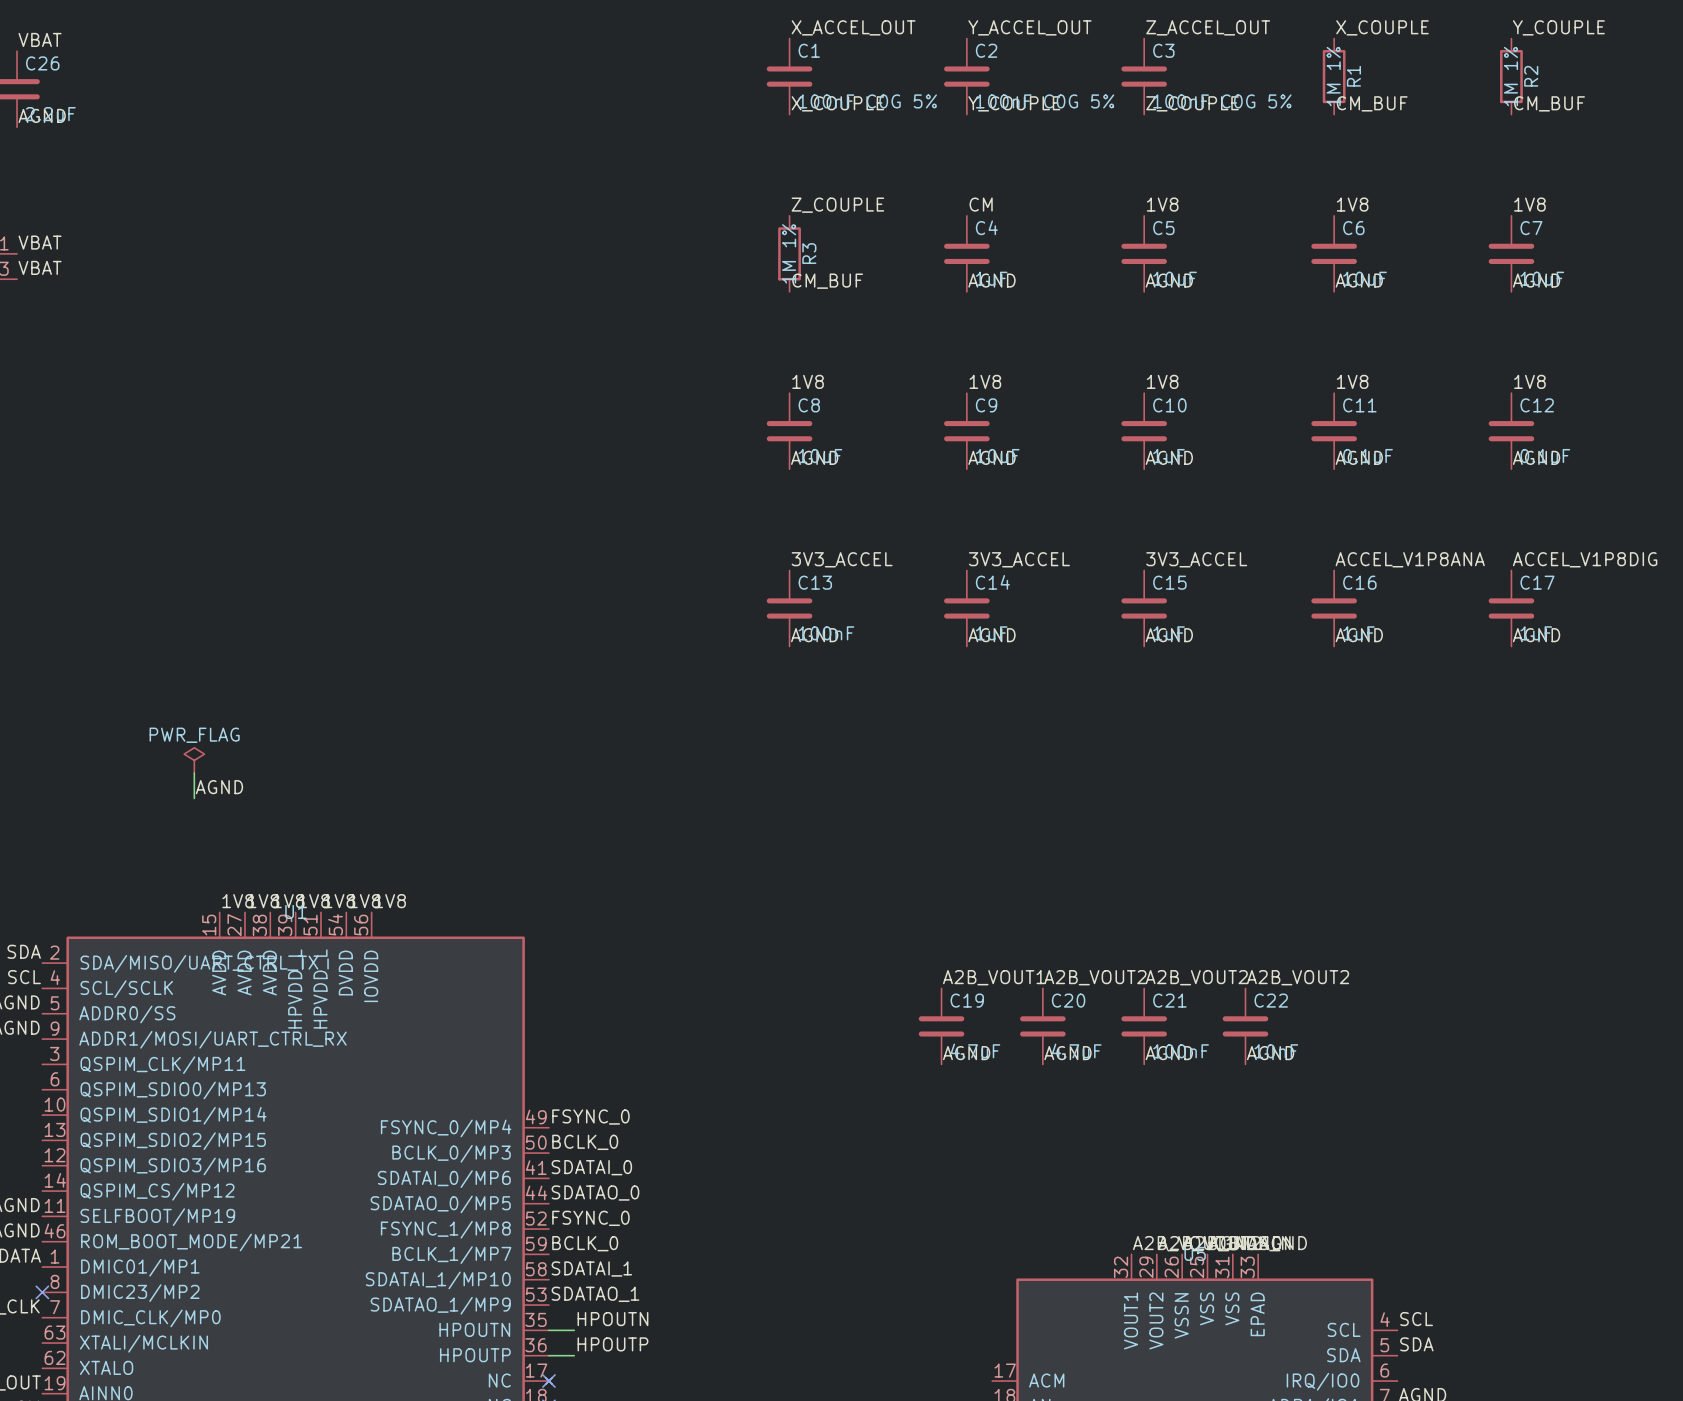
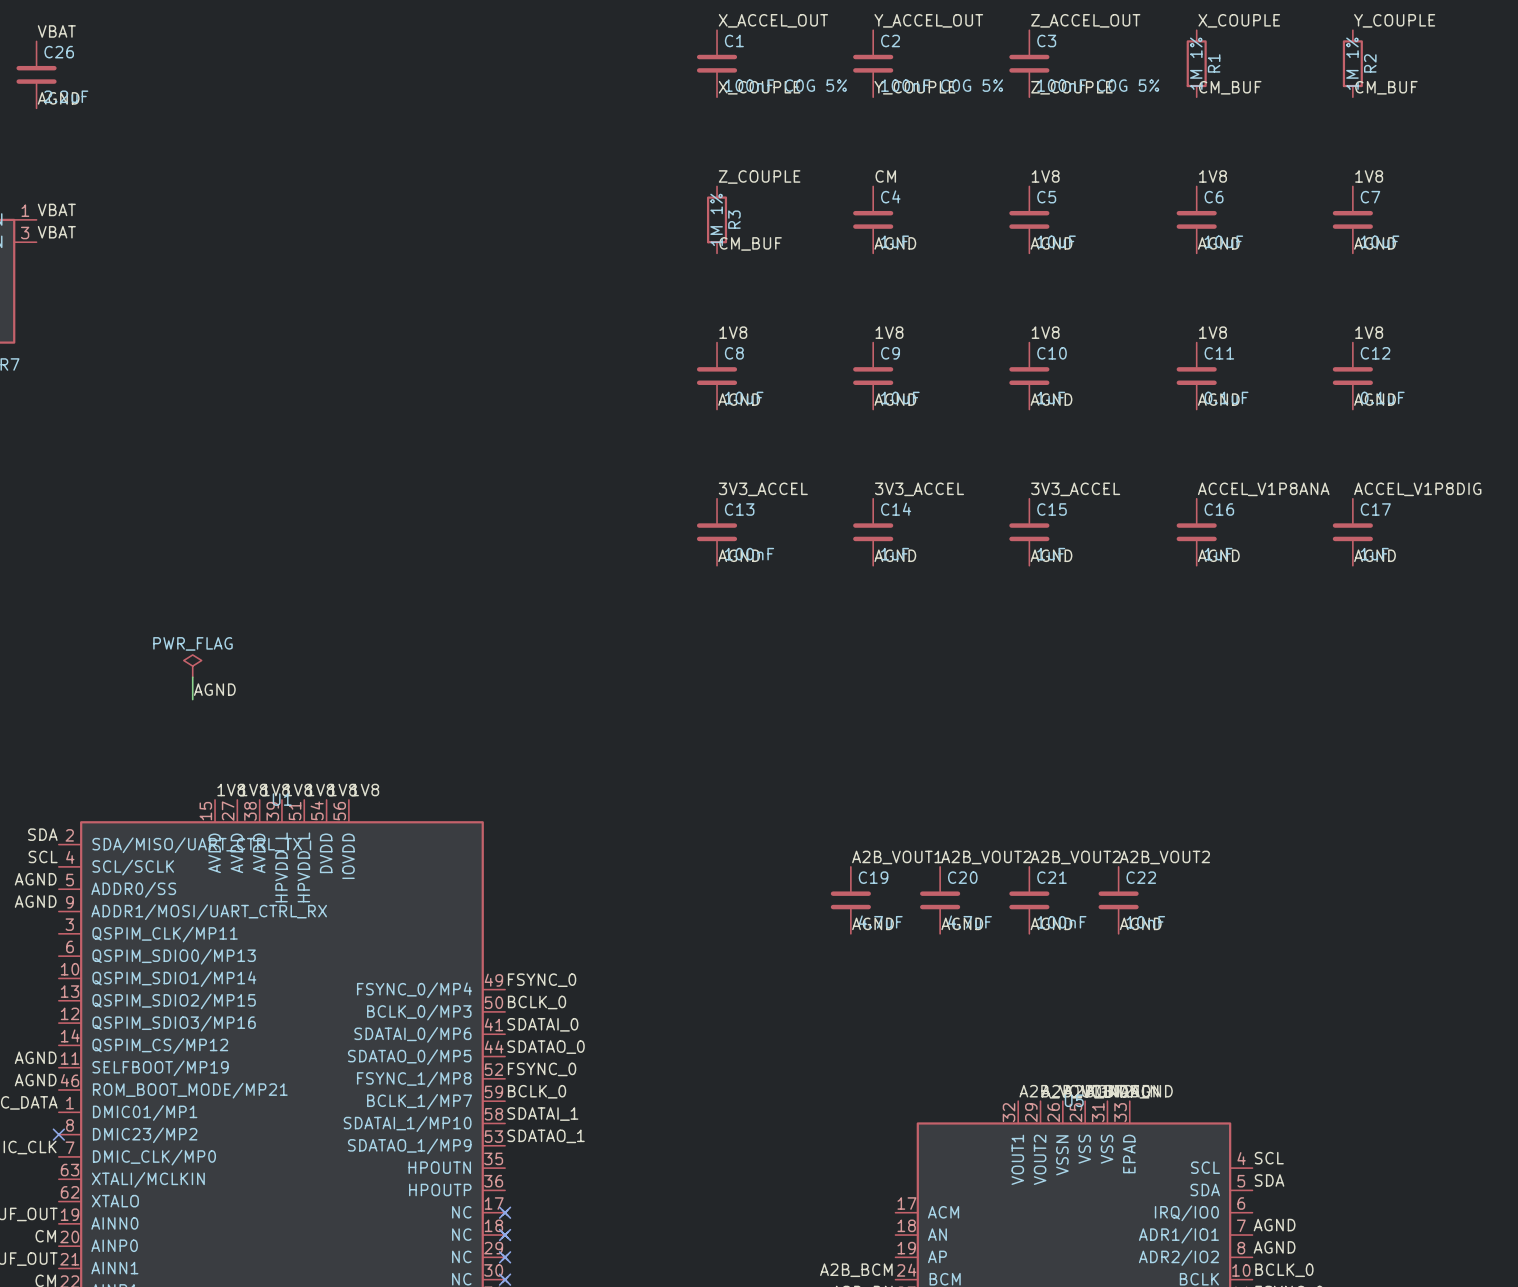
label: HPOUTN (612, 1319) -> none
wire: (548, 1330) (574, 1330) -> none
label: HPOUTP (612, 1344) -> none
wire: (548, 1355) (574, 1355) -> none

